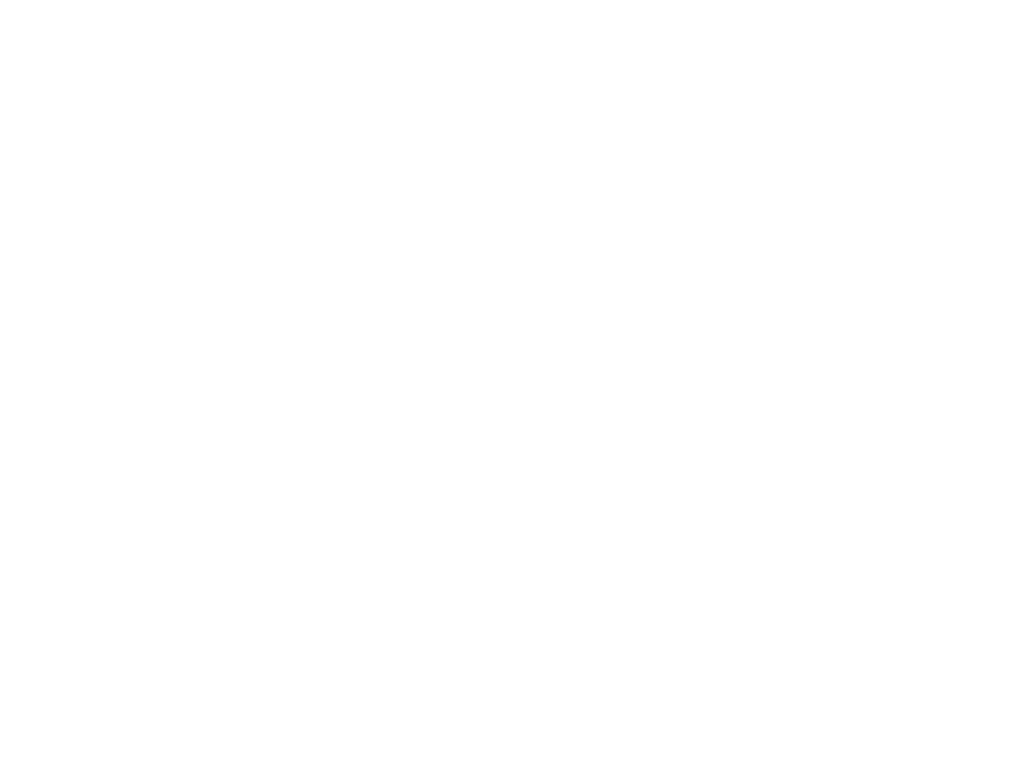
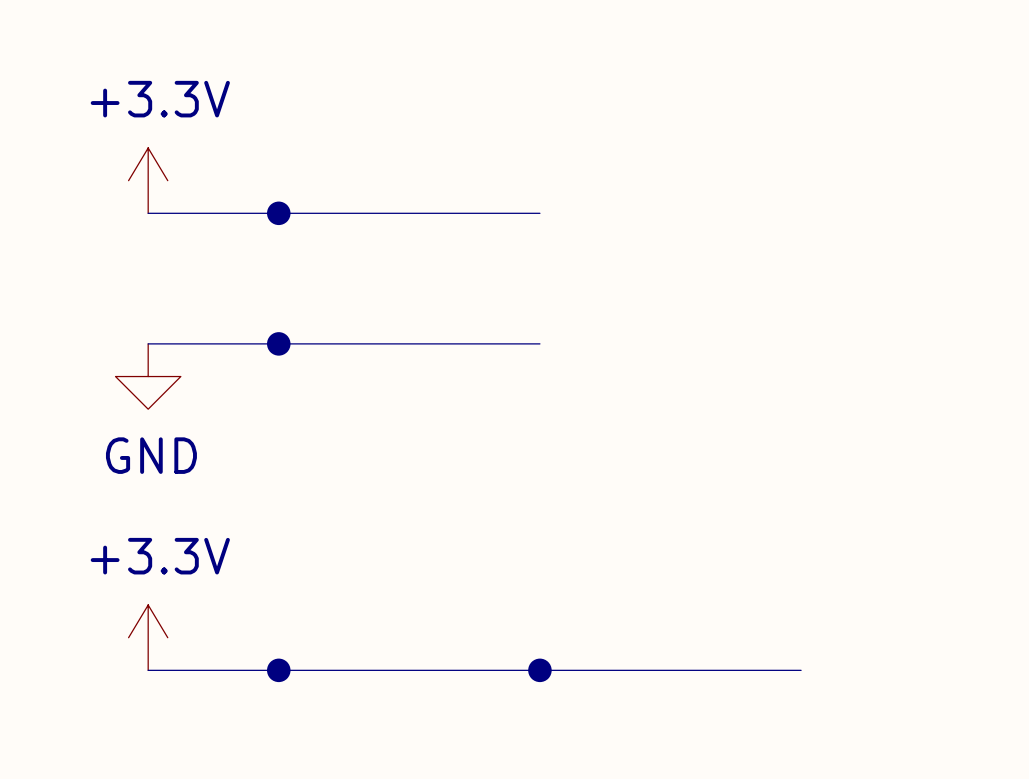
power symbol: none -> +3.3V (148, 180)
wire: none -> (148, 213) (539, 213)
junction: none -> (278, 213)
wire: none -> (148, 343) (539, 343)
junction: none -> (278, 343)
power symbol: none -> GND (148, 376)
power symbol: none -> +3.3V (148, 637)
wire: none -> (148, 670) (801, 670)
junction: none -> (278, 670)
junction: none -> (539, 670)

